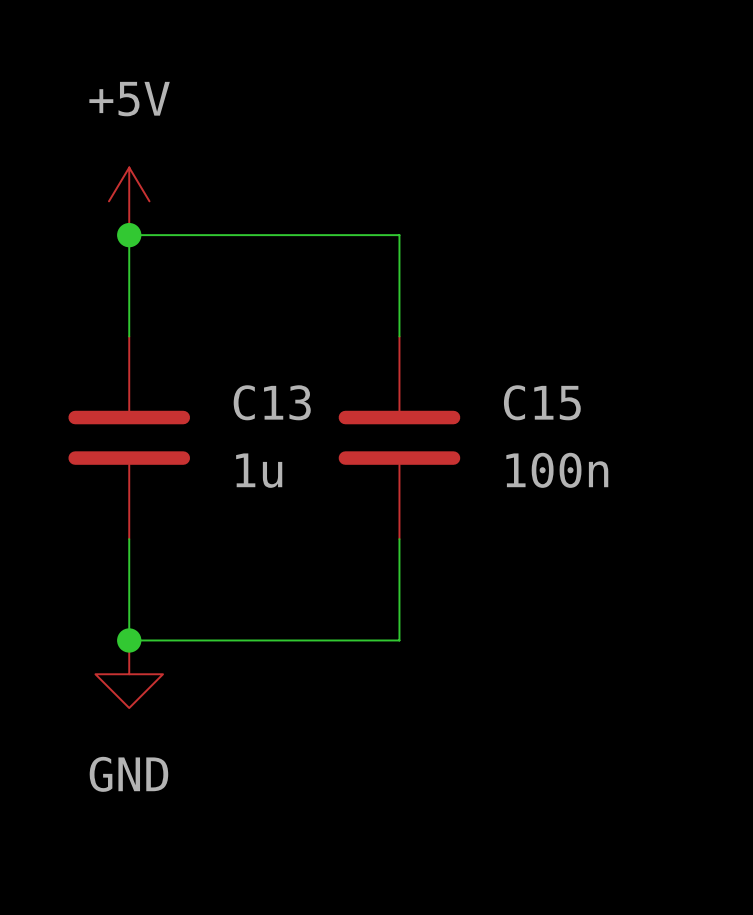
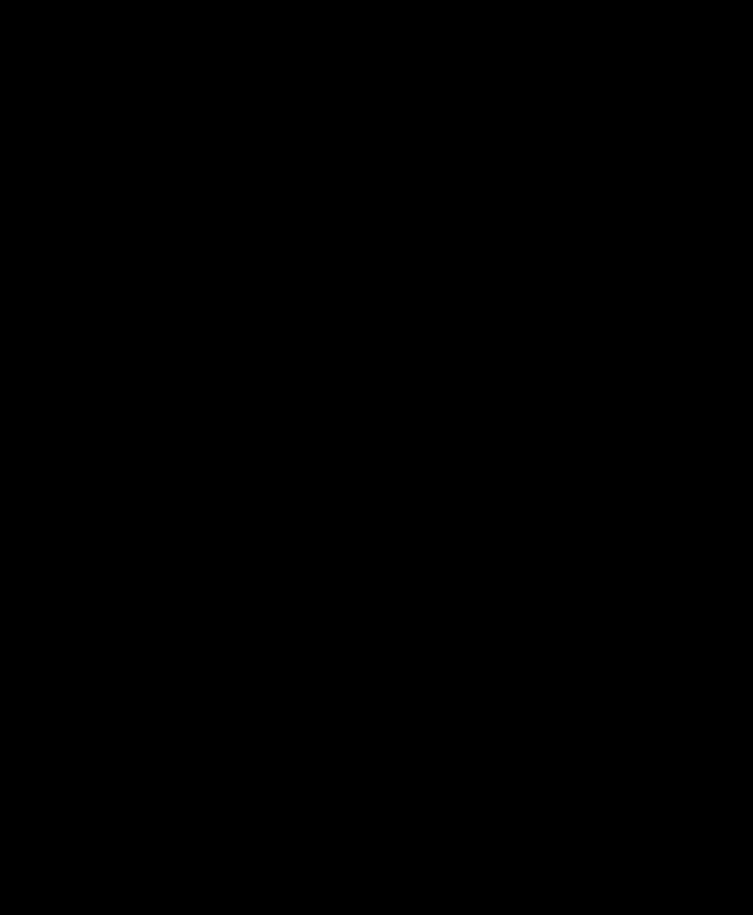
power symbol: +5V (129, 201) -> none
junction: (129, 235) -> none
wire: (129, 336) (129, 235) (399, 235) (399, 336) -> none
C13: 1u (129, 437) -> none
C15: 100n (399, 437) -> none
wire: (129, 539) (129, 640) (399, 640) (399, 539) -> none
junction: (129, 640) -> none
power symbol: GND (129, 674) -> none

